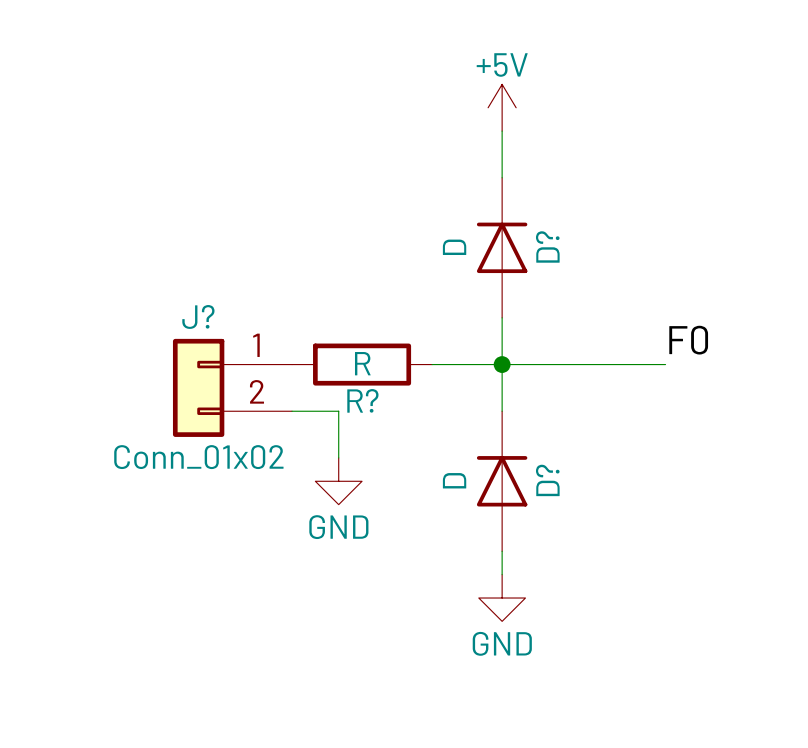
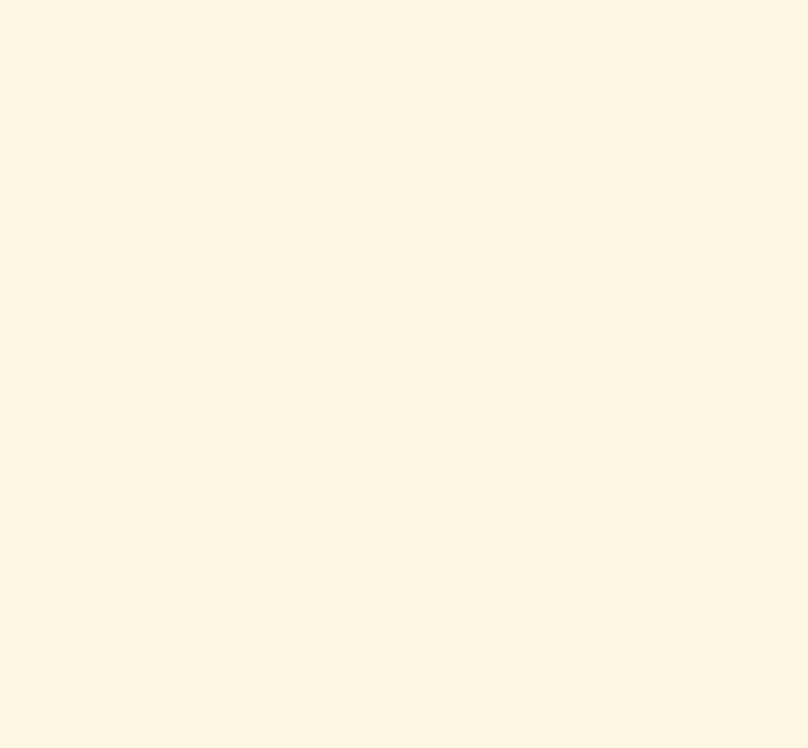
power symbol: +5V (502, 107) -> none
wire: (502, 131) (502, 177) -> none
D?: D (502, 247) -> none
wire: (502, 317) (502, 411) -> none
label: F0 (688, 340) -> none
R?: R (362, 364) -> none
wire: (432, 364) (665, 364) -> none
junction: (502, 364) -> none
J?: Conn_01x02 (232, 387) -> none
wire: (292, 411) (338, 411) (338, 457) -> none
power symbol: GND (338, 481) -> none
D?: D (502, 481) -> none
wire: (502, 551) (502, 574) -> none
power symbol: GND (502, 598) -> none

